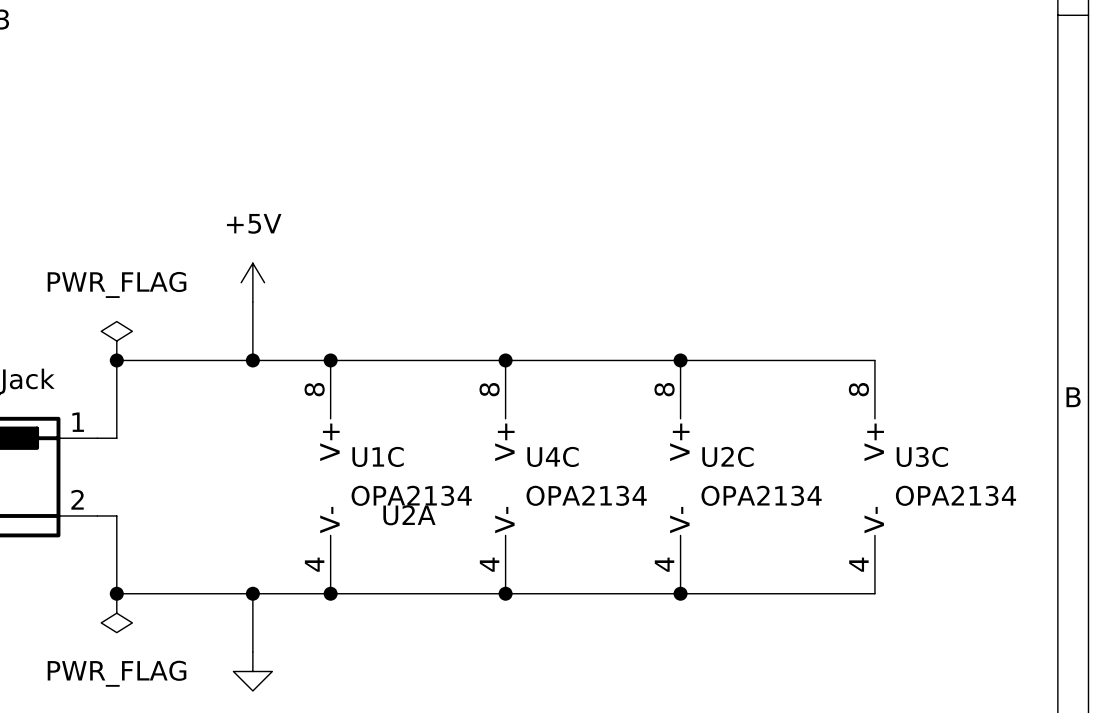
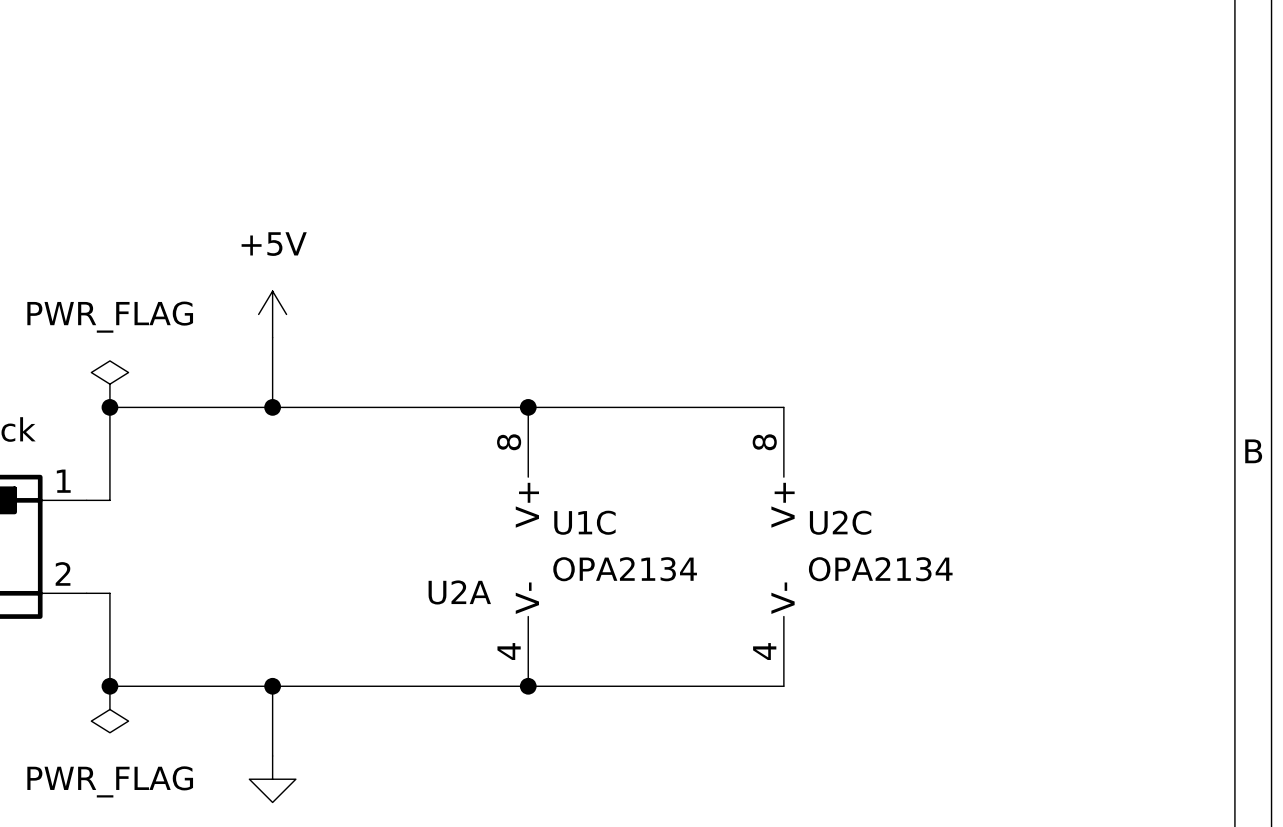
junction: (330, 360) -> none
junction position: (505, 360) -> (528, 407)
wire: (680, 360) (874, 360) -> none
junction: (680, 360) -> none
U1C position: (330, 477) -> (528, 546)
U4C: OPA2134 (505, 477) -> none
U3C: OPA2134 (874, 477) -> none
junction: (330, 593) -> none
junction position: (505, 593) -> (528, 686)
wire: (680, 593) (874, 593) -> none
junction: (680, 593) -> none

